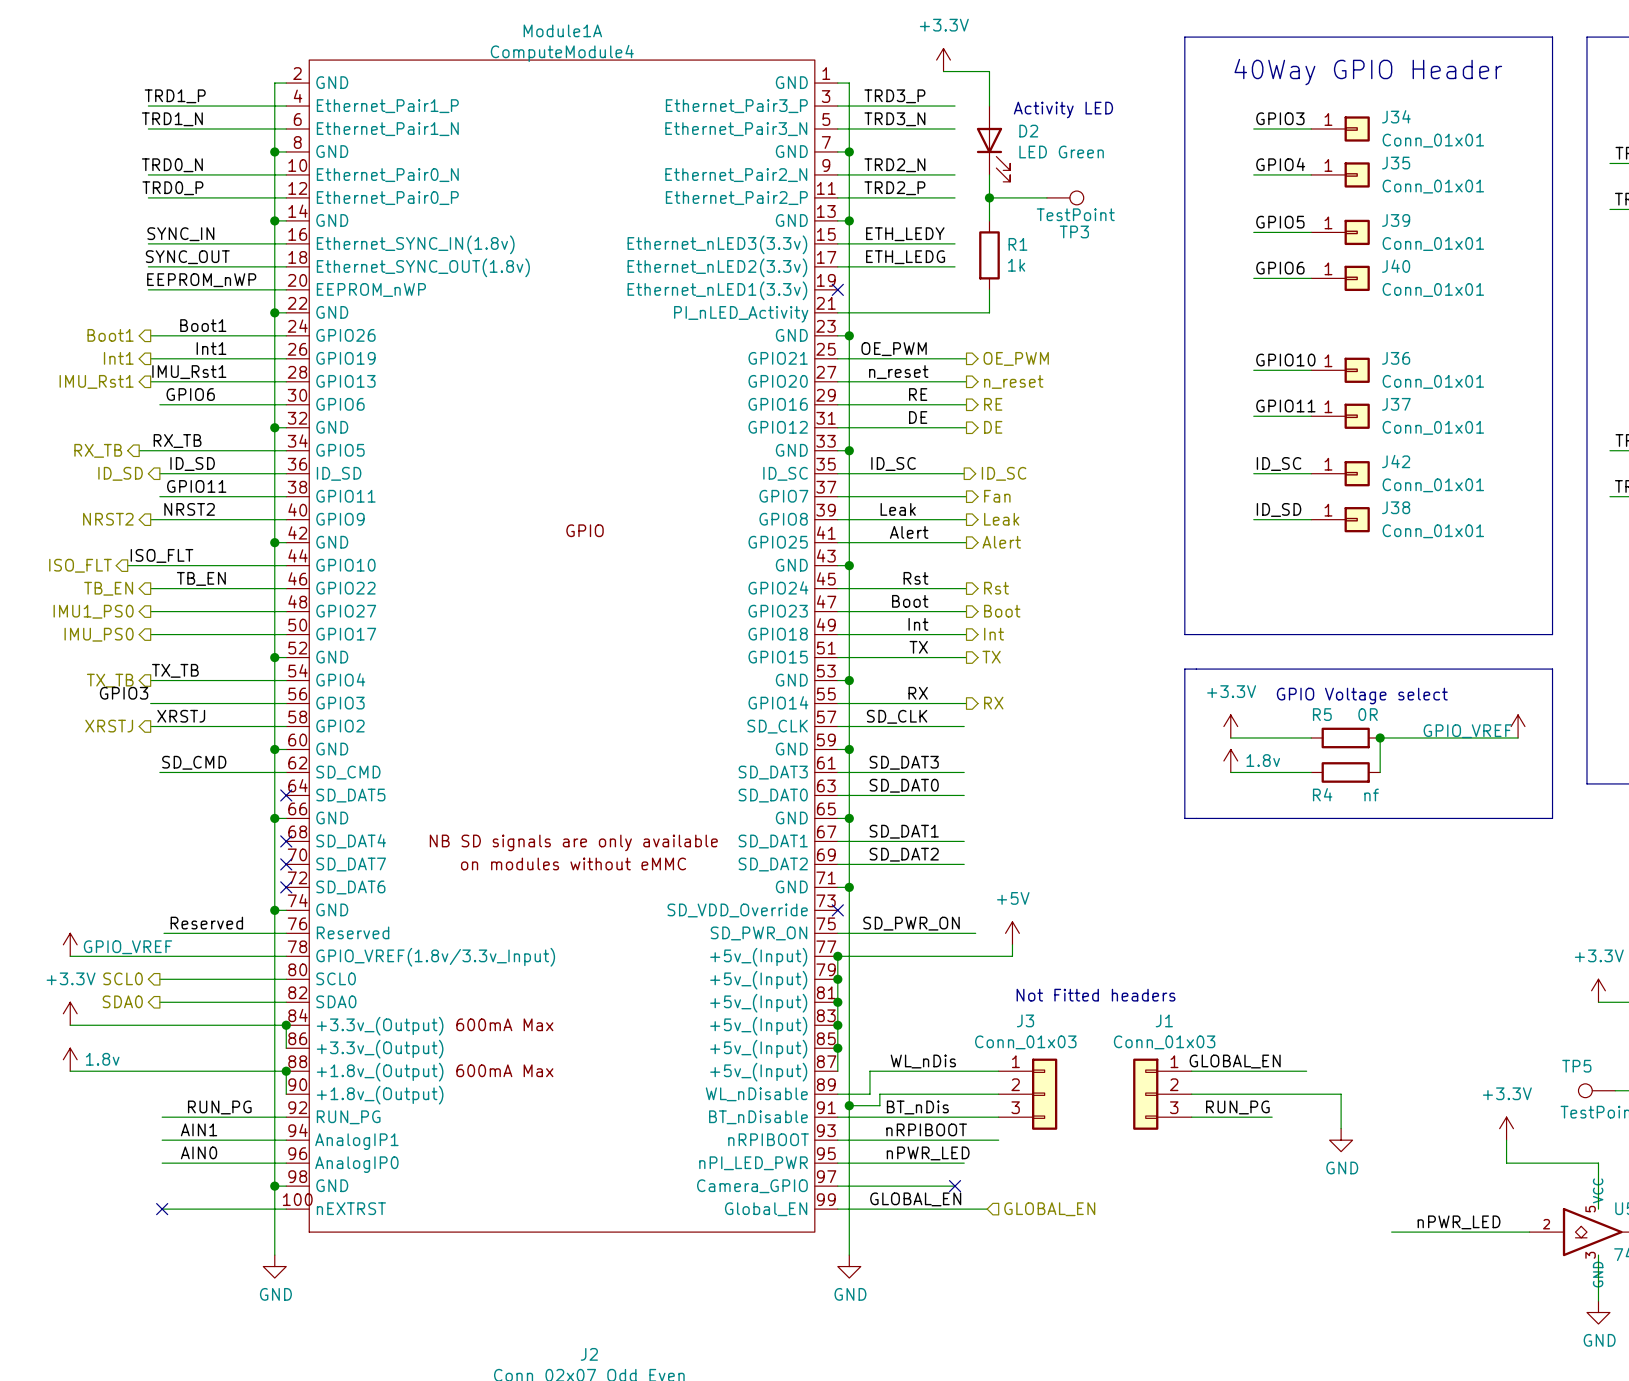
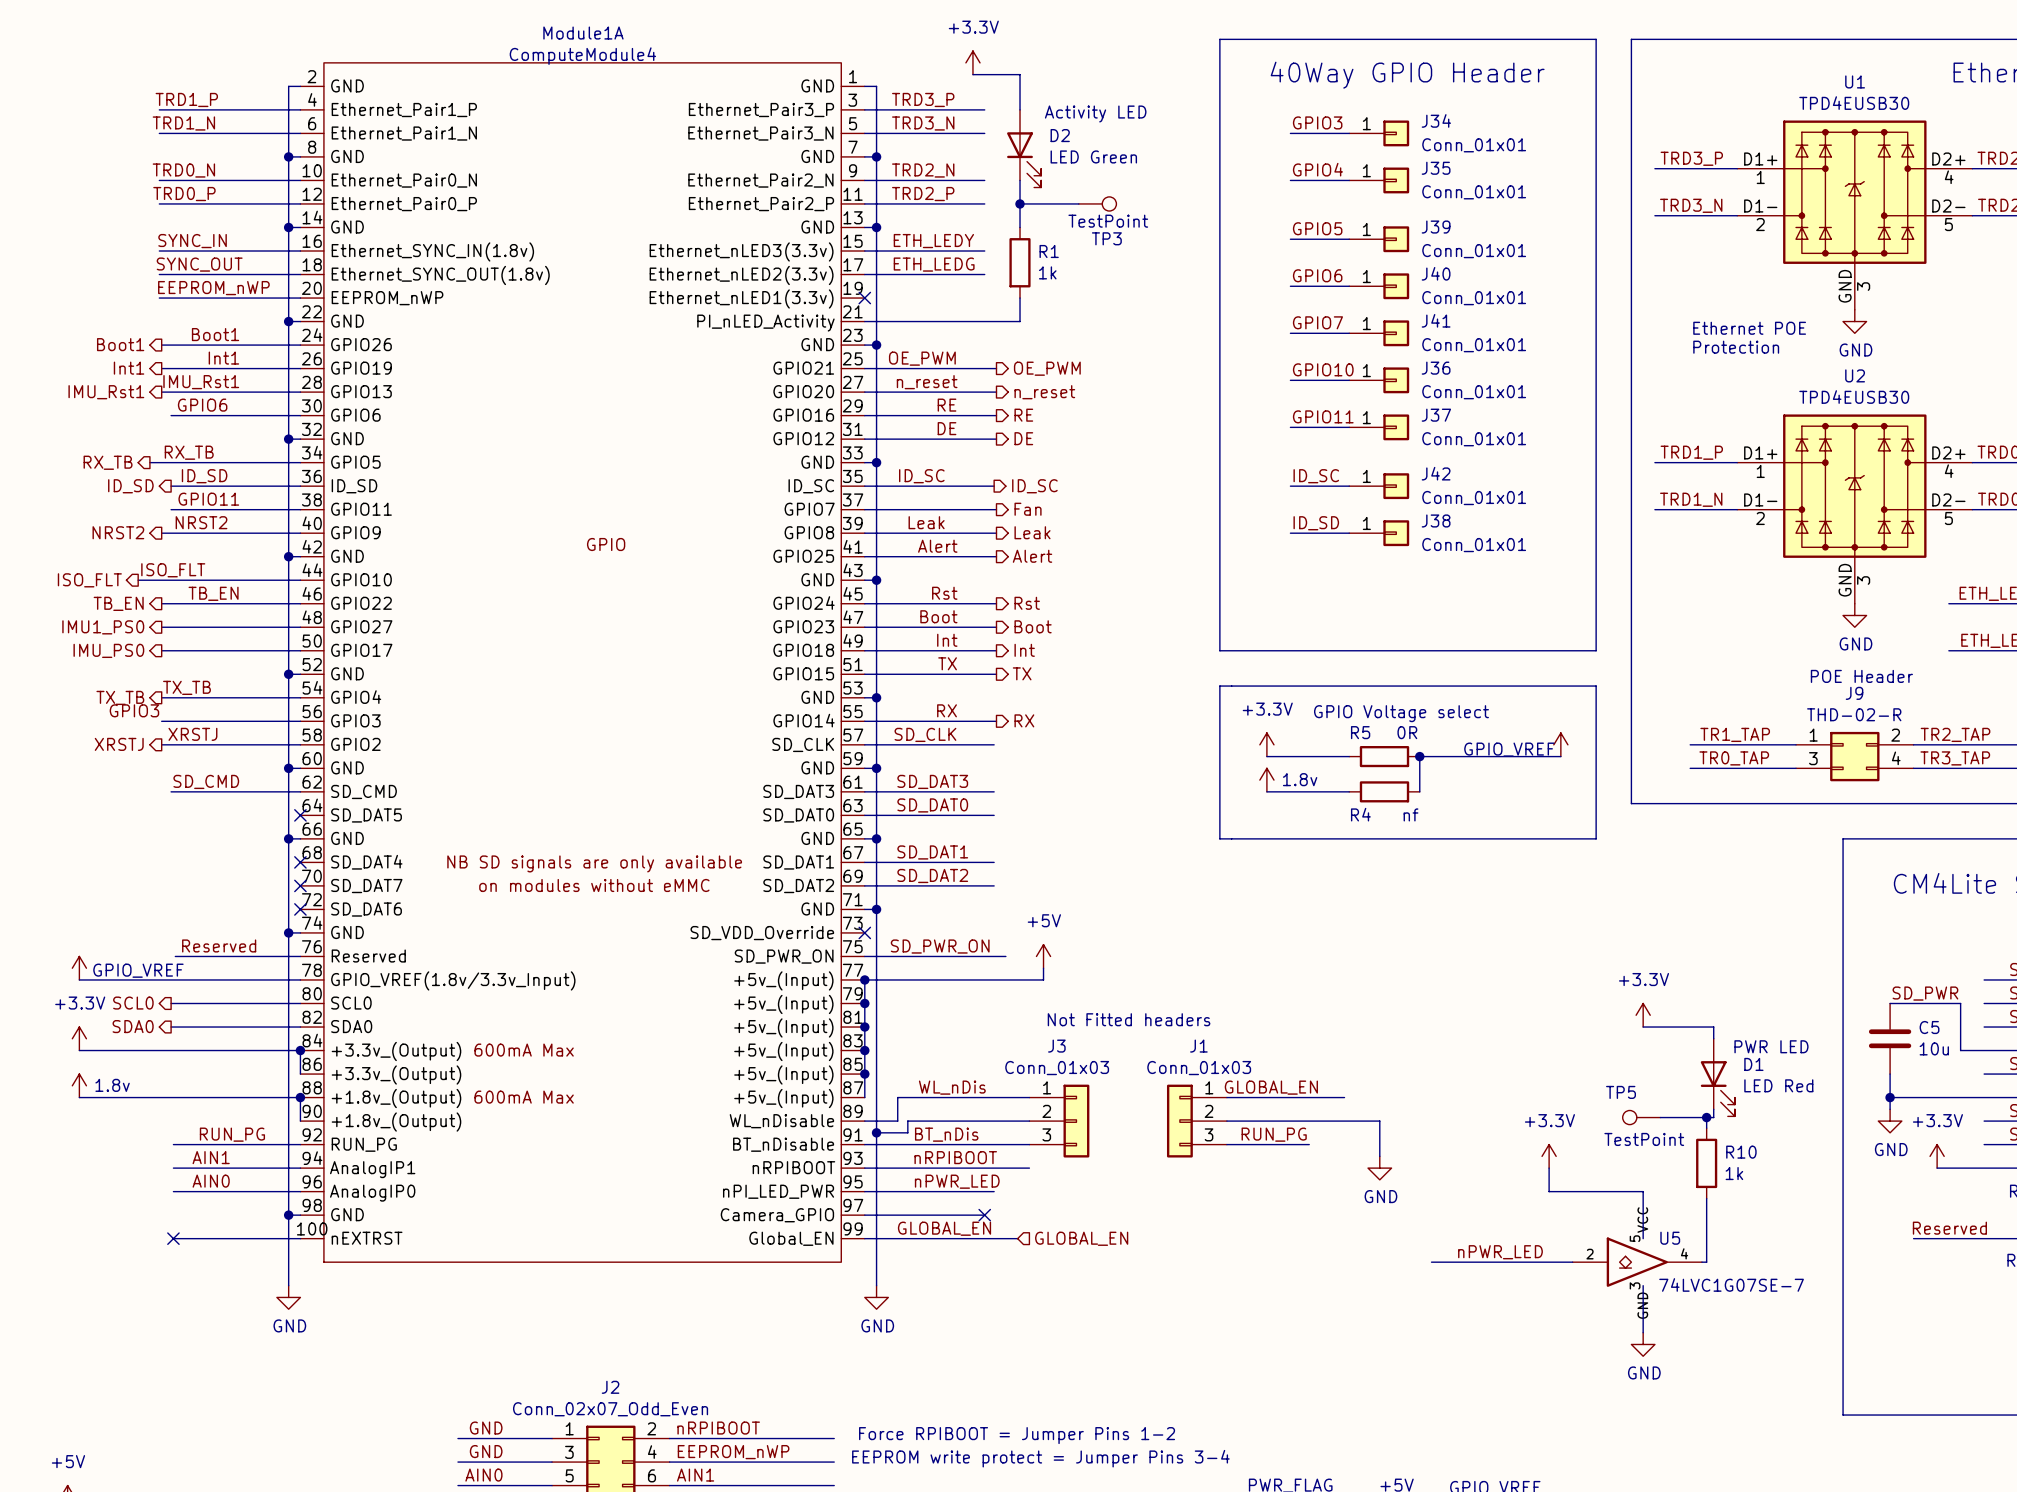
label: none -> GPIO7 (1317, 322)
wire: none -> (1290, 333) (1349, 333)
J41: none -> Conn_01x01 (1379, 333)

